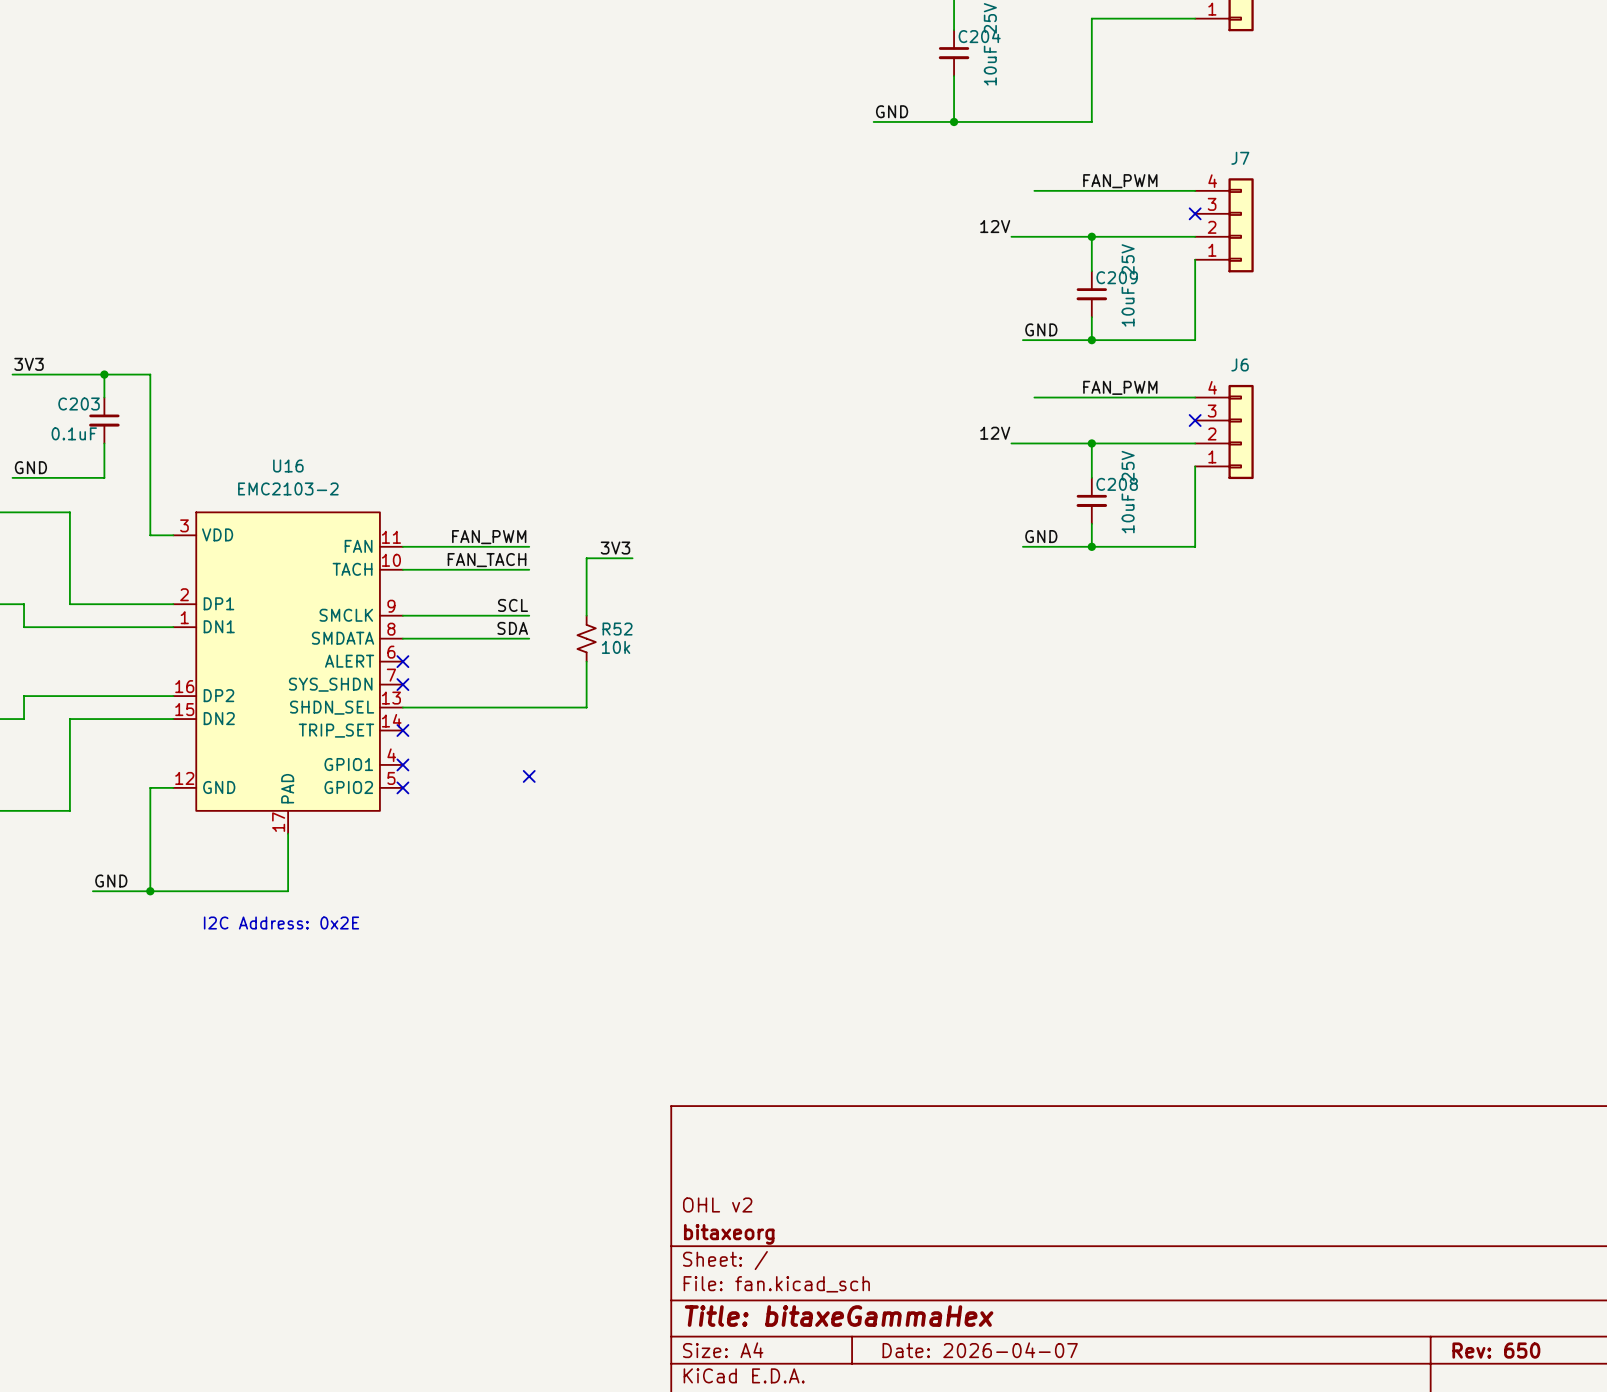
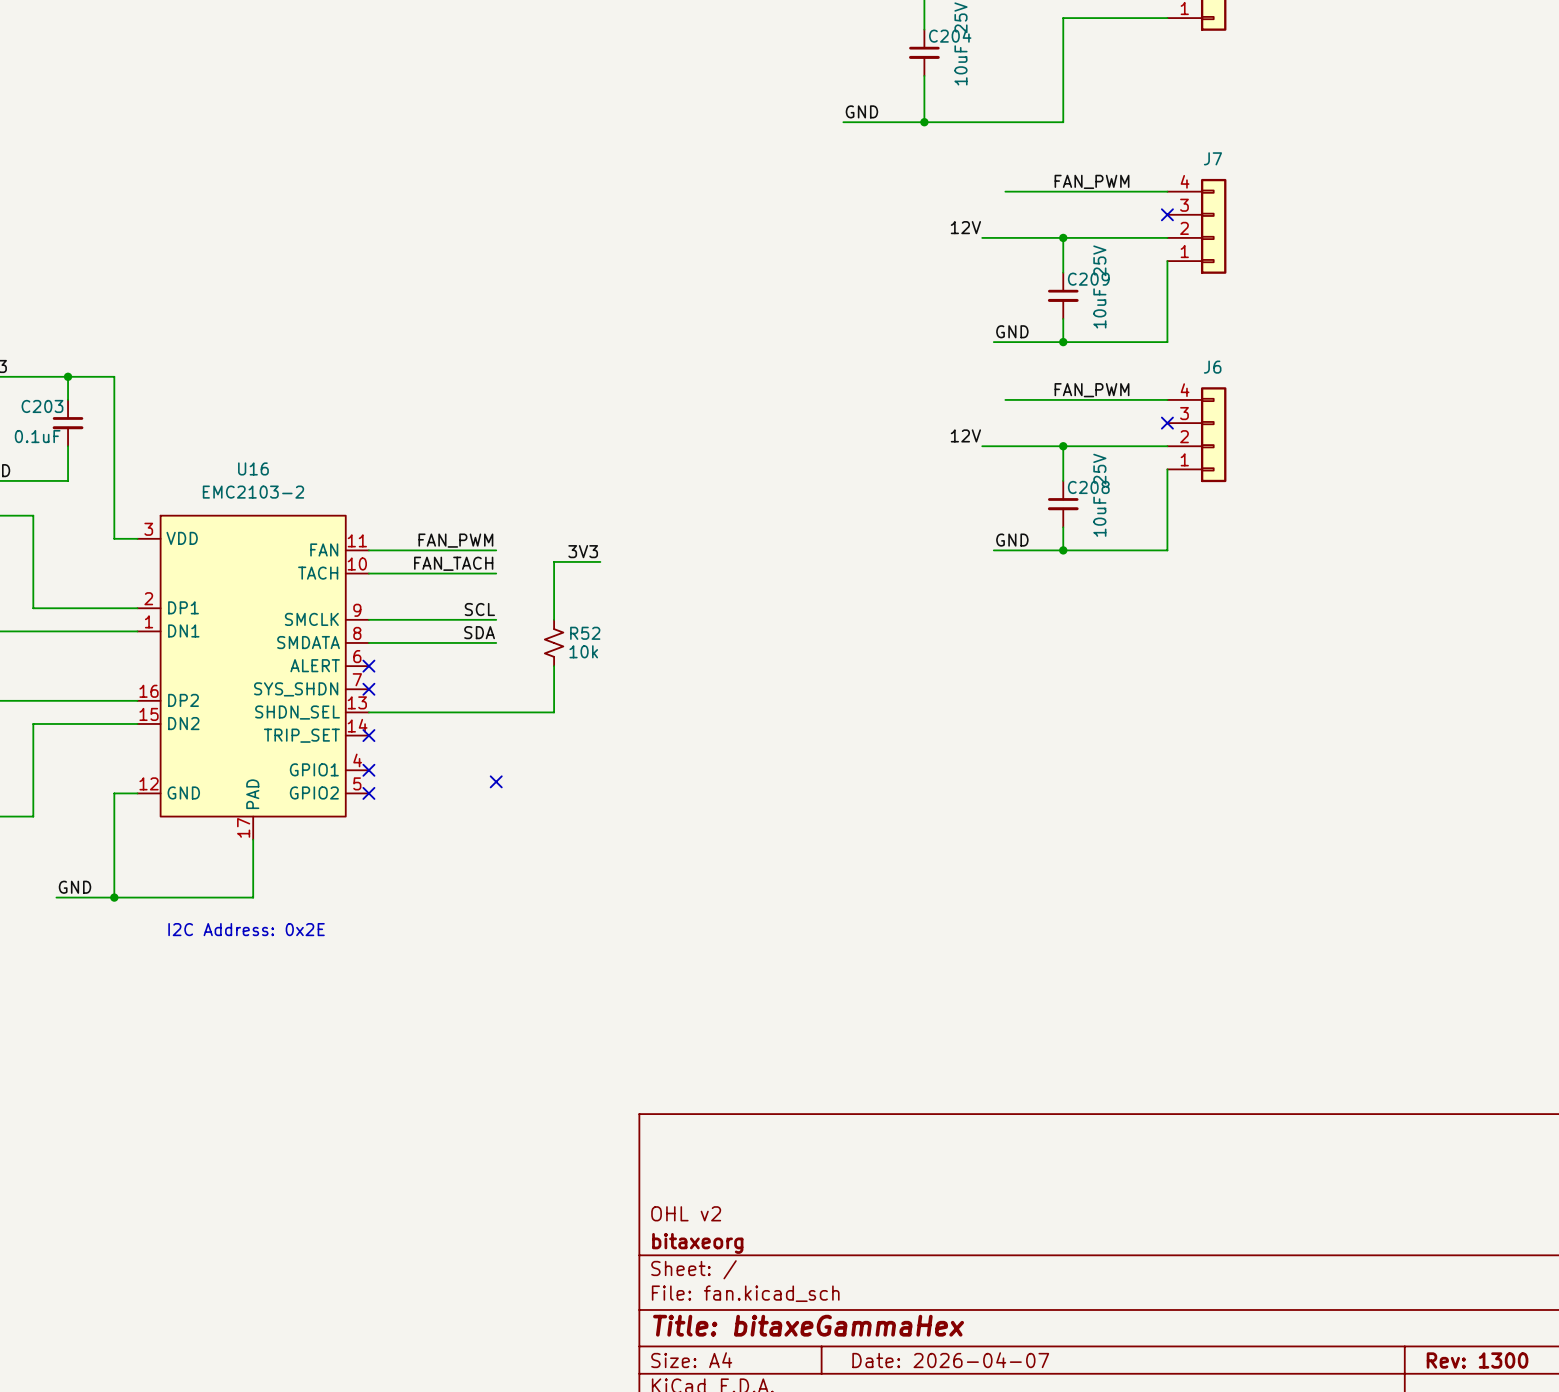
title block: Rev: 650 (1496, 1350) -> Rev: 1300 (1477, 1360)

